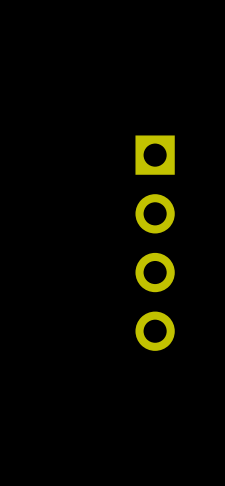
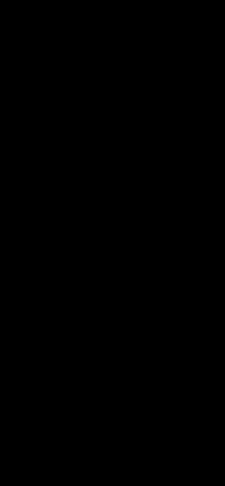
part: (155, 243) -> none

